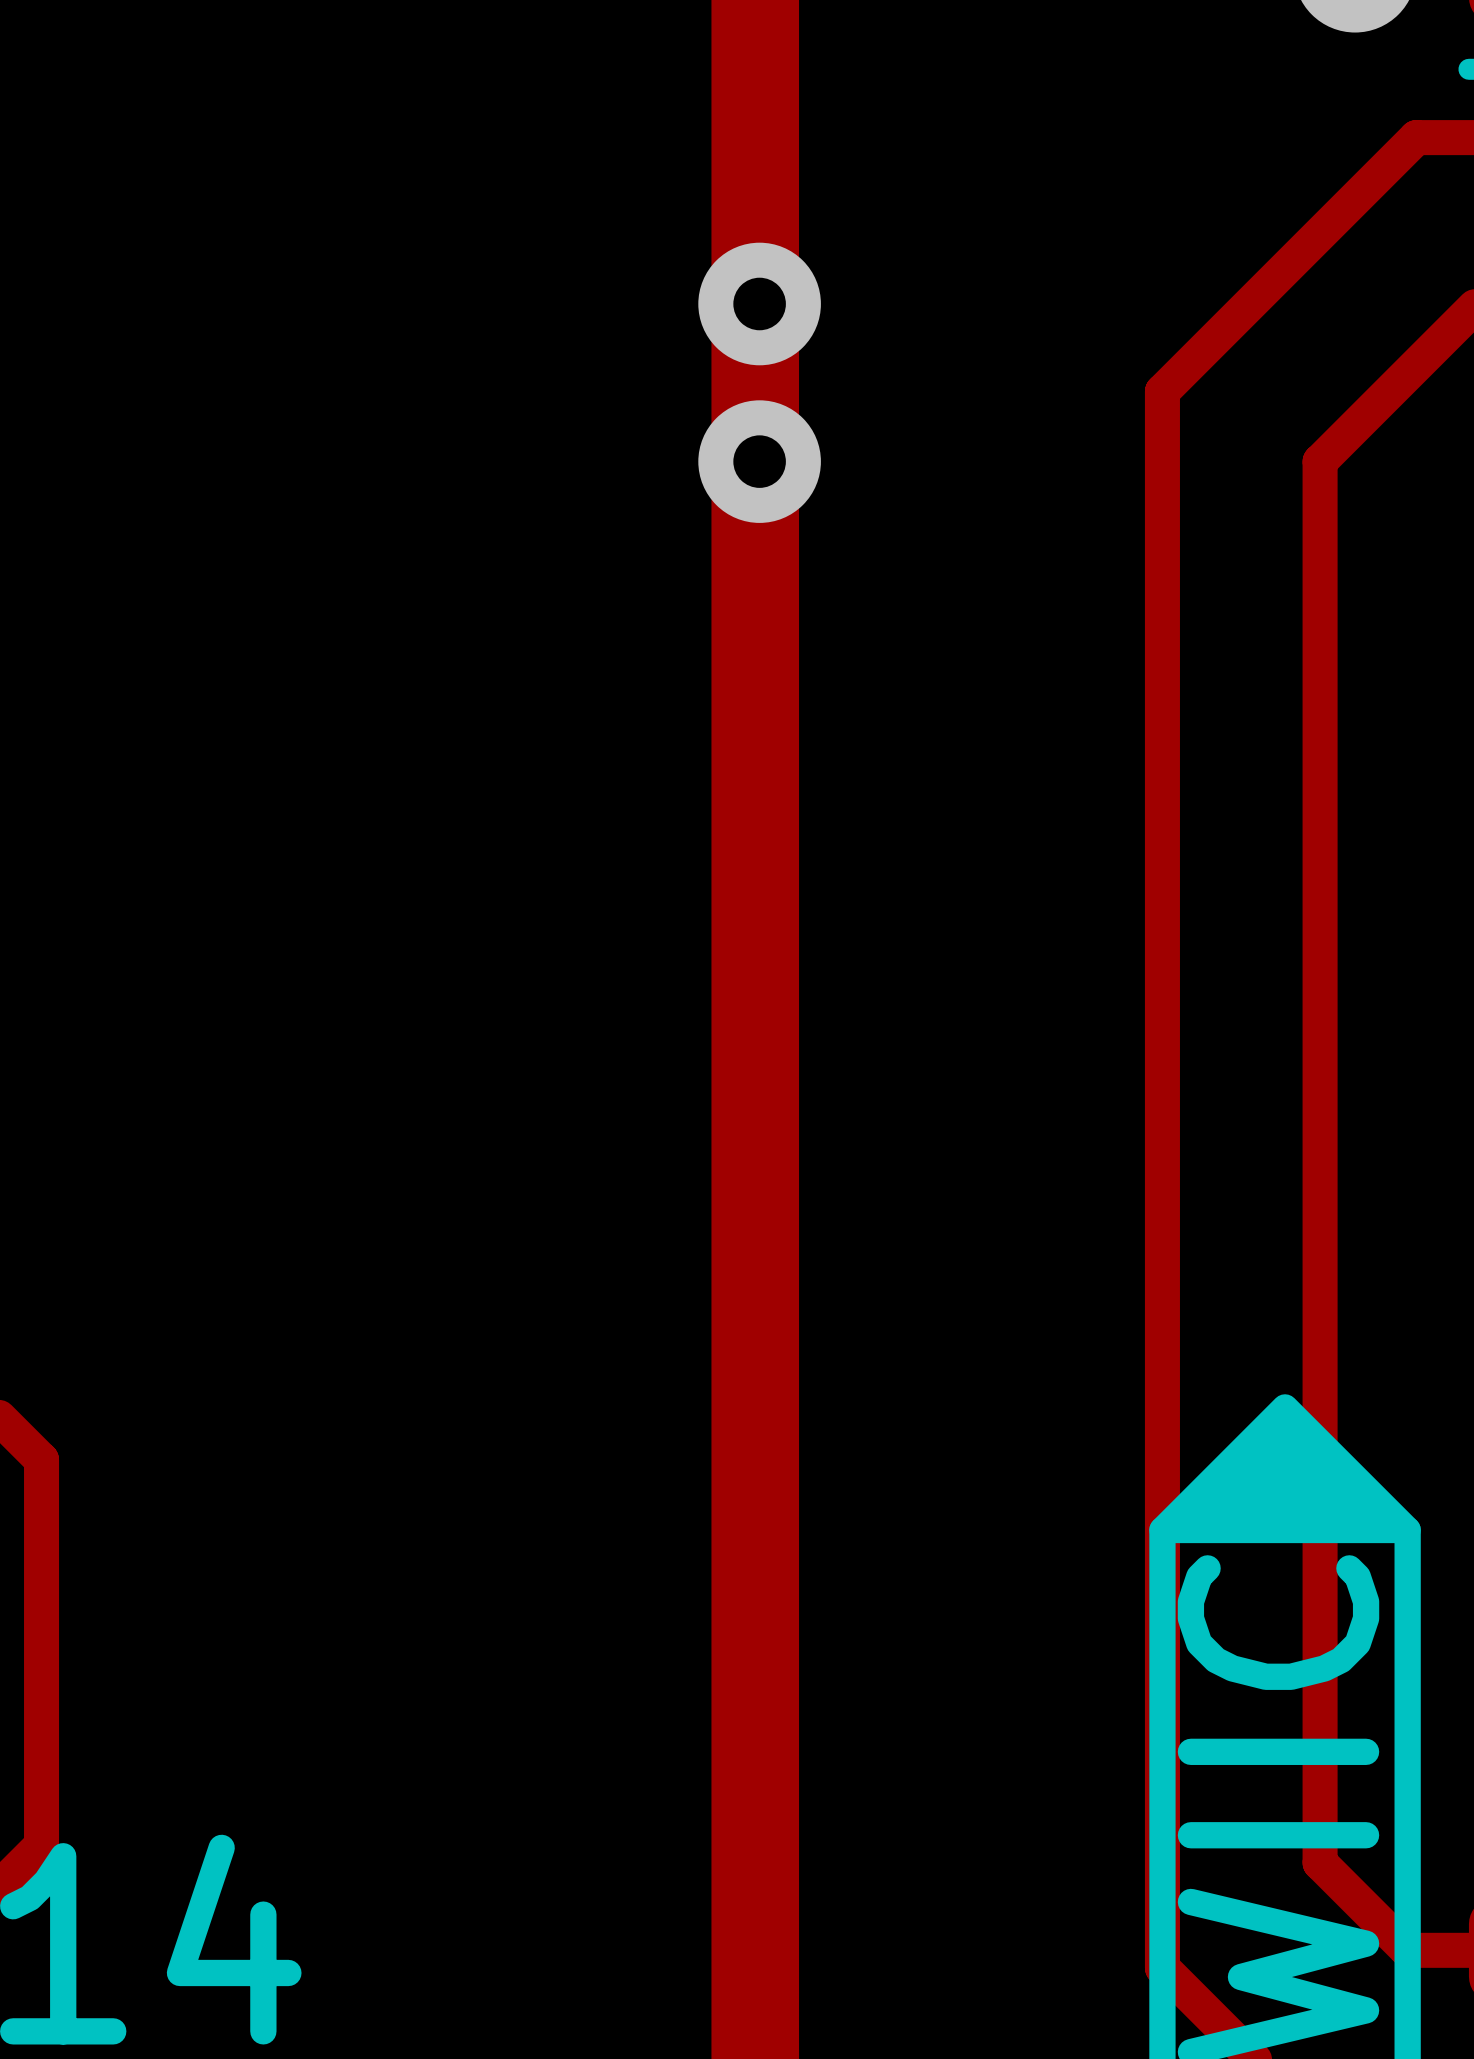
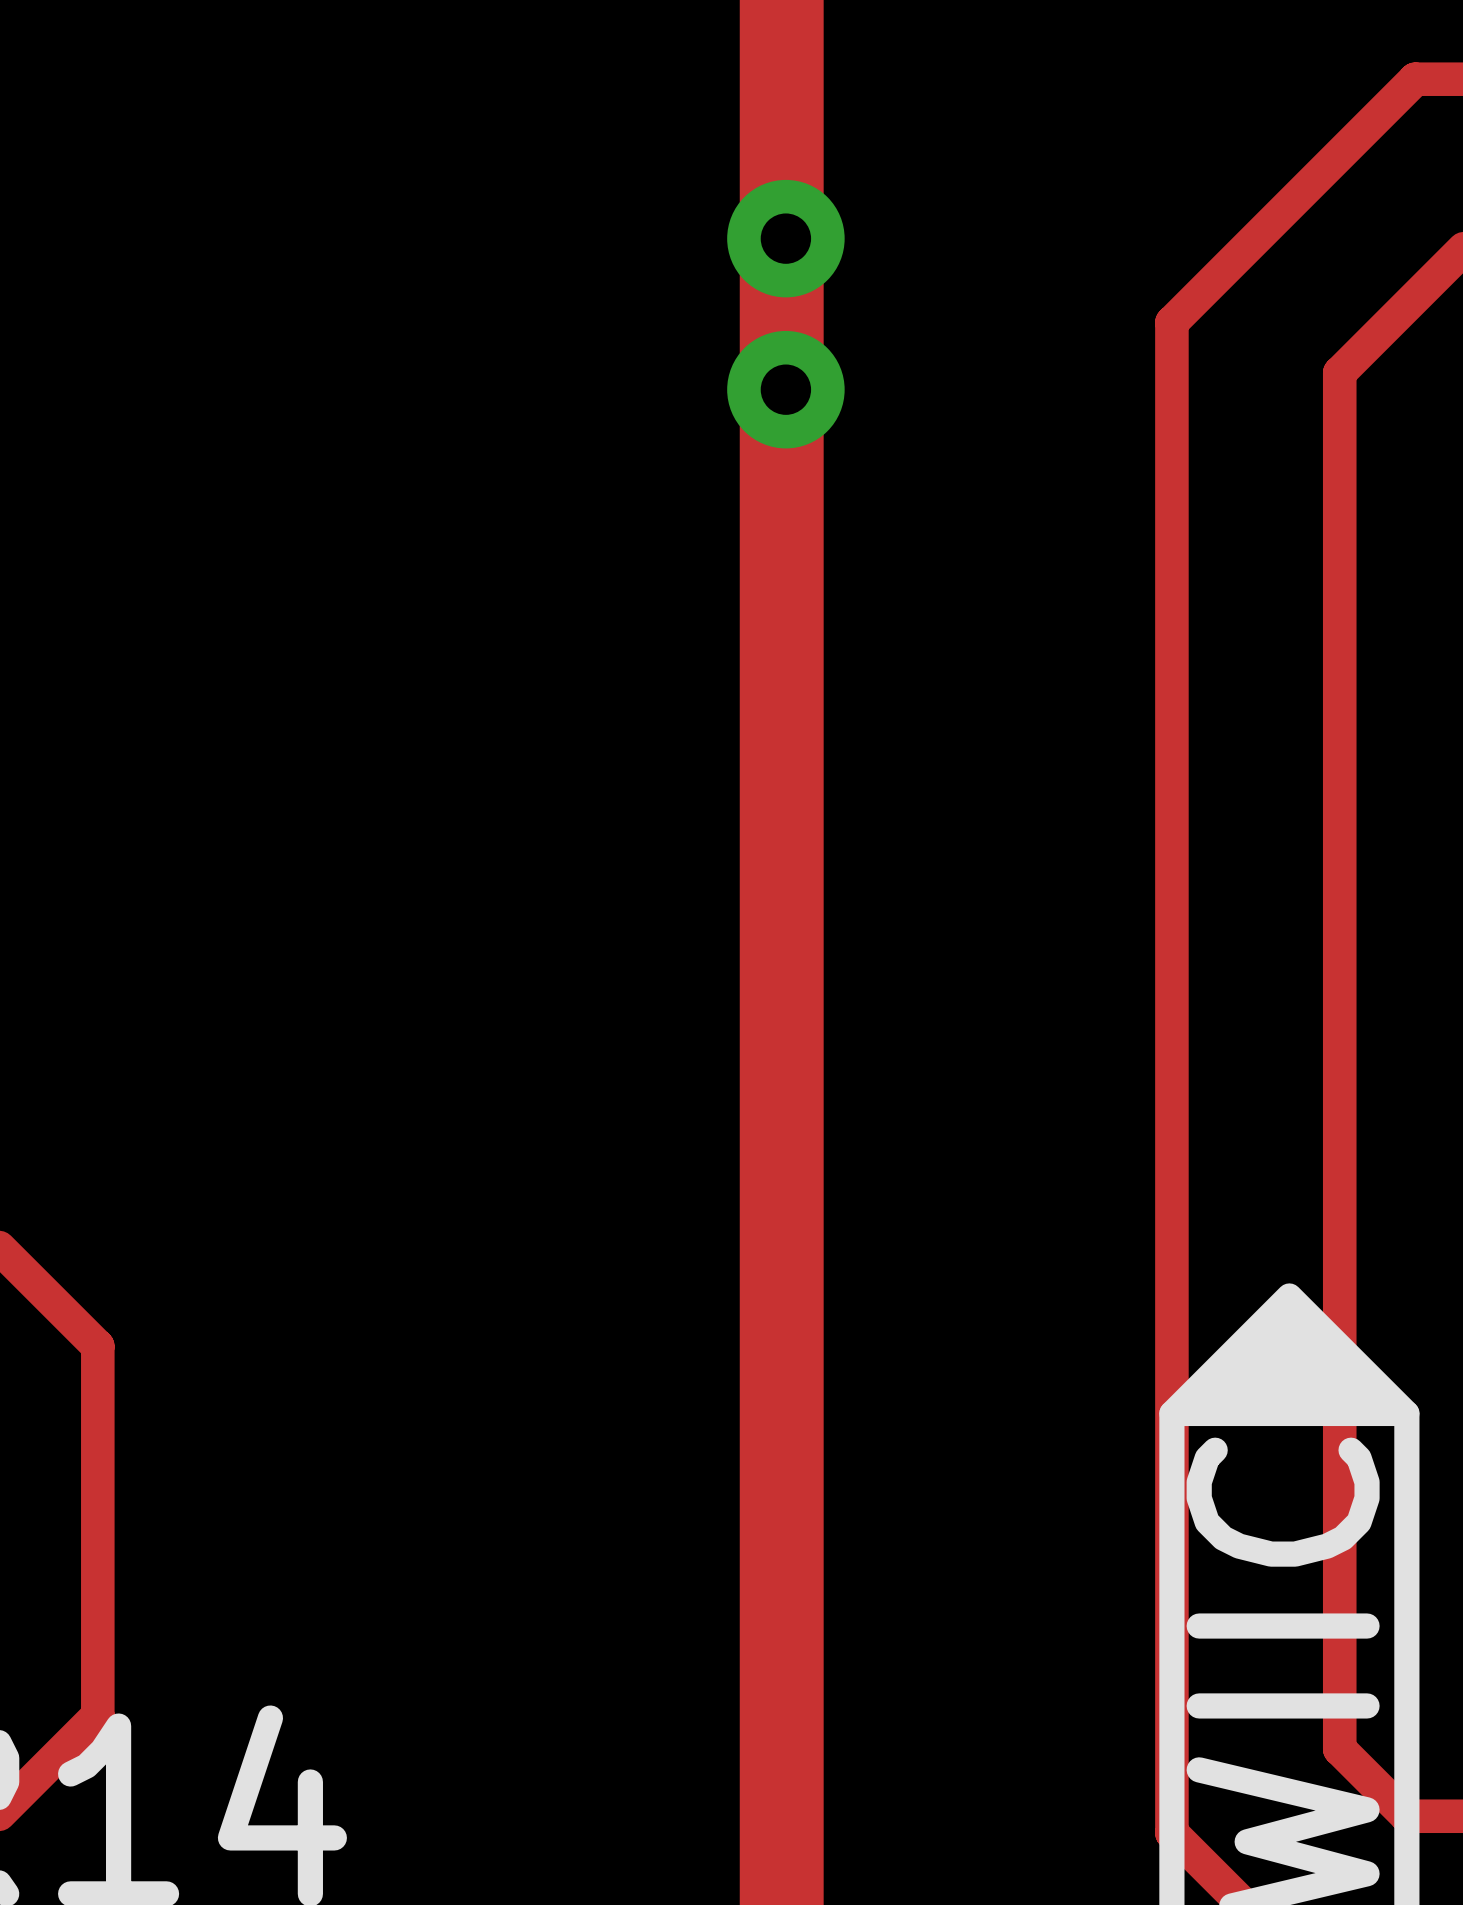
track: (1337, 444) (1320, 461) (1320, 1862) (1337, 1880) -> (1339, 372) (1339, 1749)

